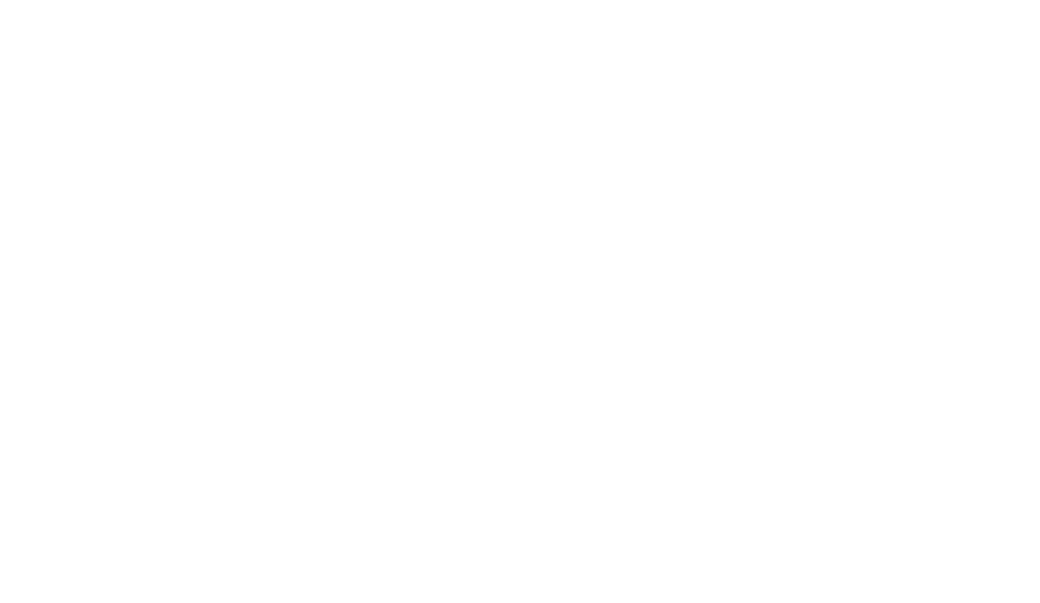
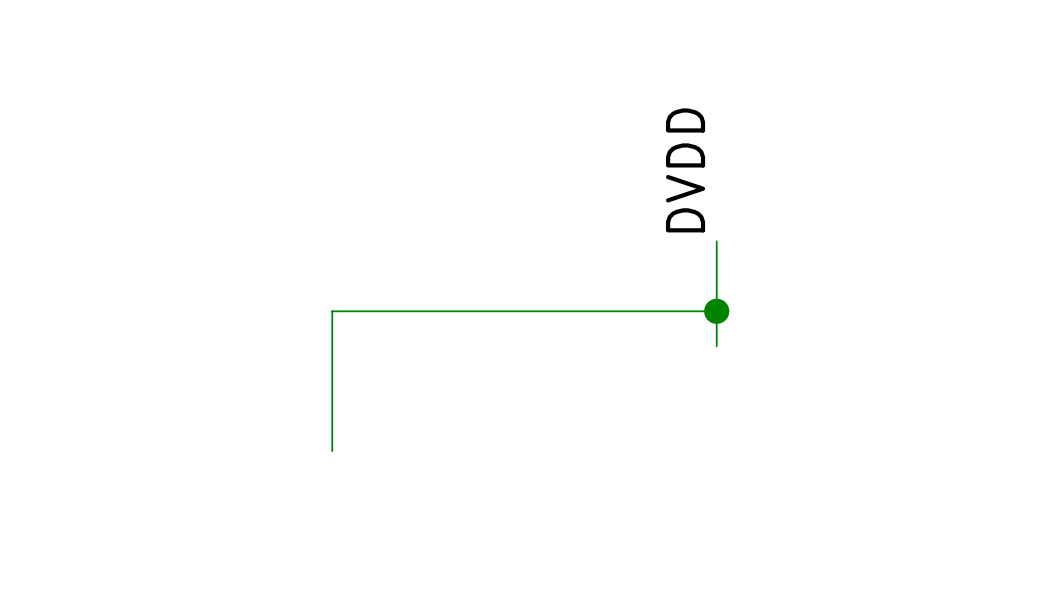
label: none -> DVDD (685, 170)
wire: none -> (716, 241) (716, 346)
wire: none -> (716, 311) (332, 311) (332, 451)
junction: none -> (716, 311)

